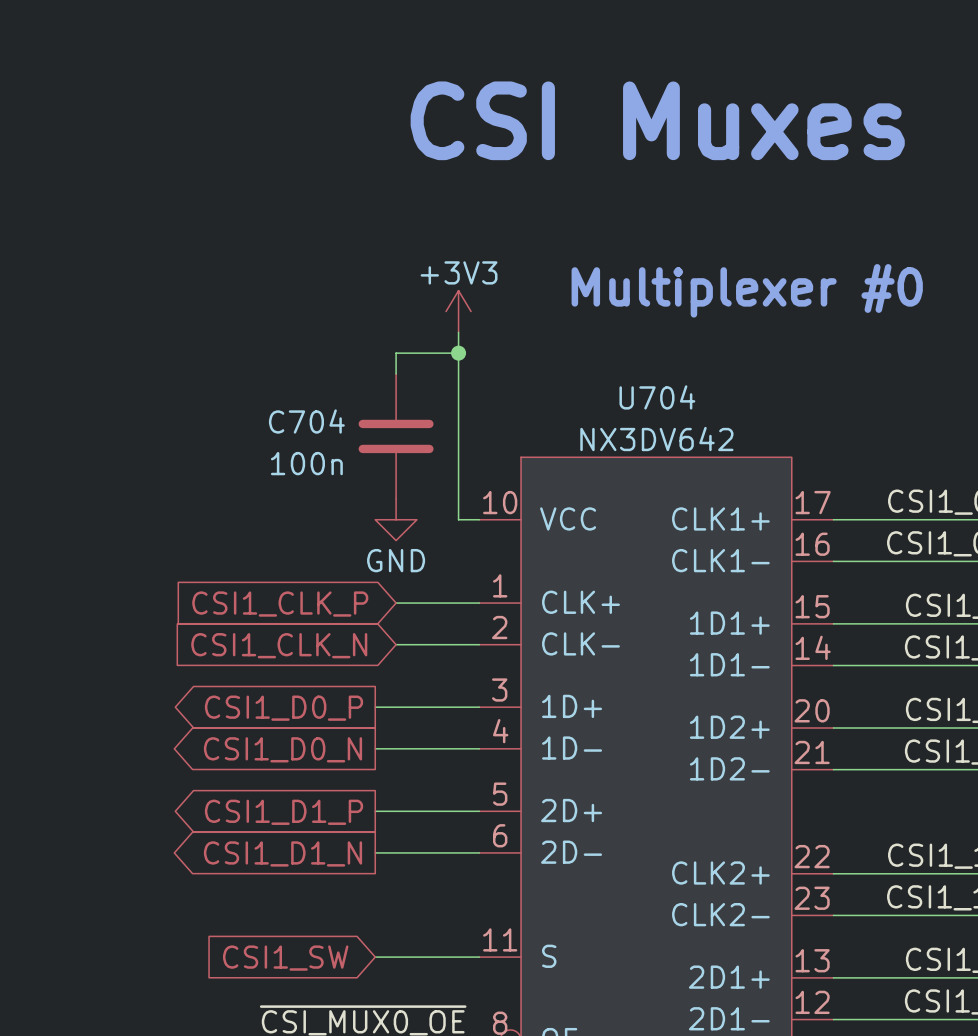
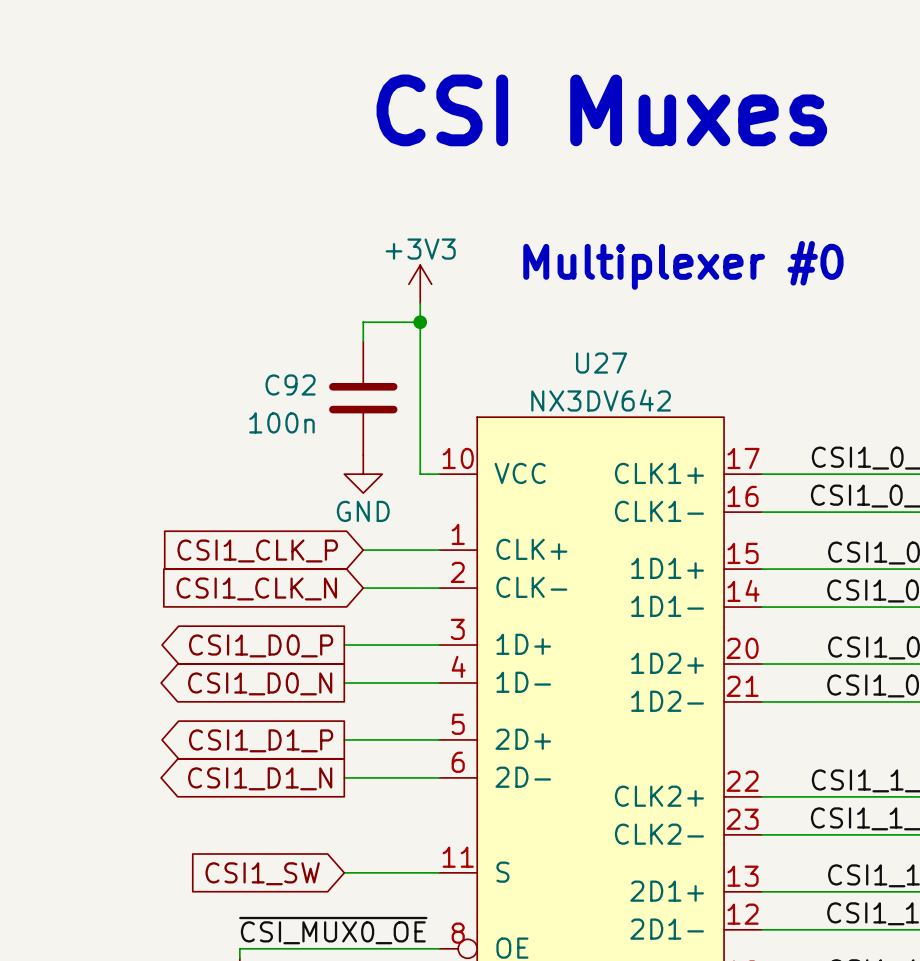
U704 name: U704 (657, 397) -> U27 (601, 363)
C704 name: C704 (306, 421) -> C92 (290, 384)

